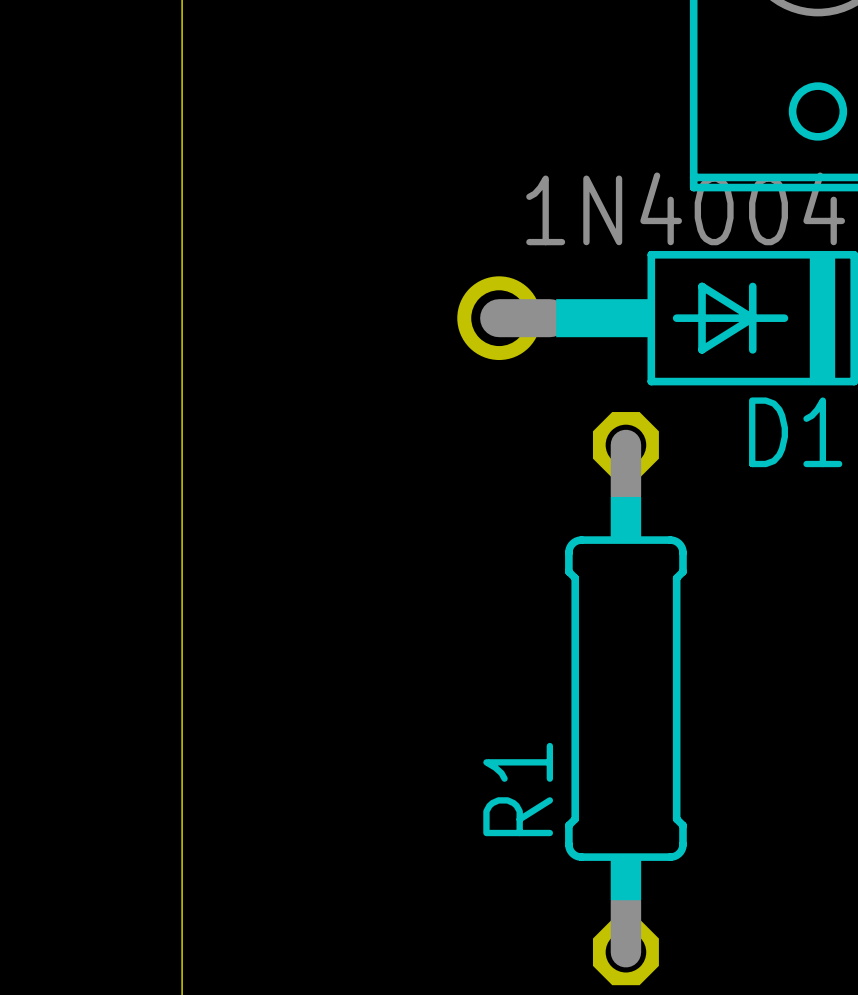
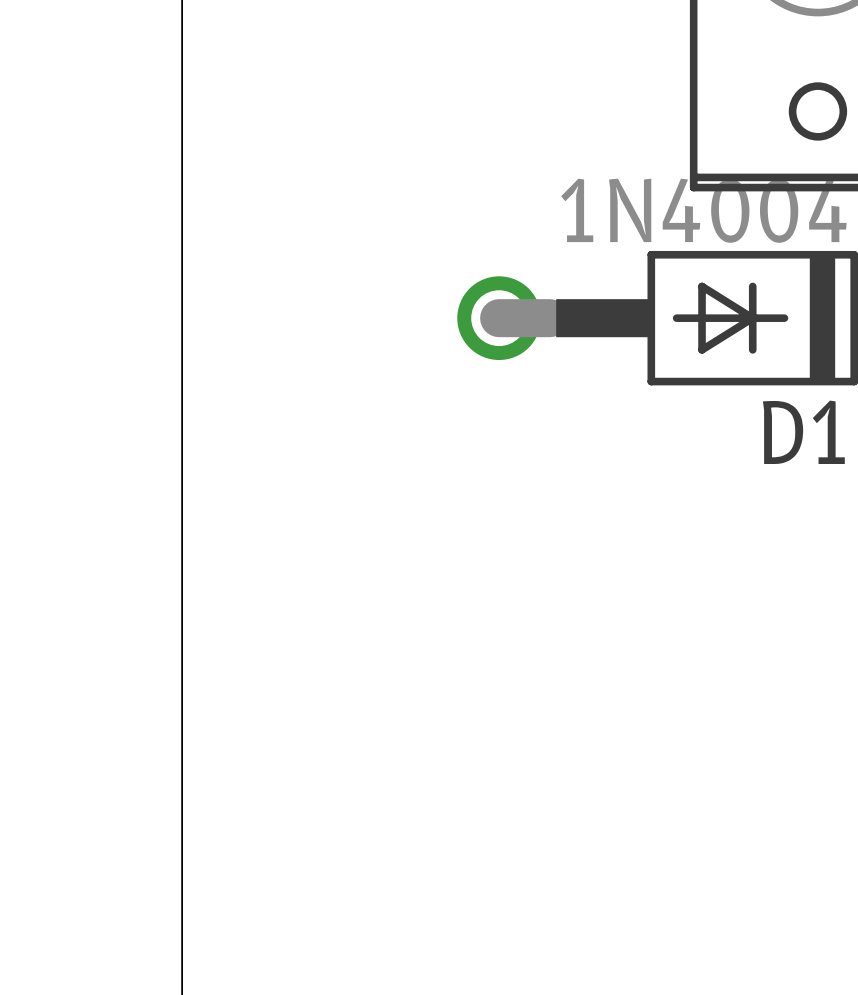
R1: (625, 698) -> none

